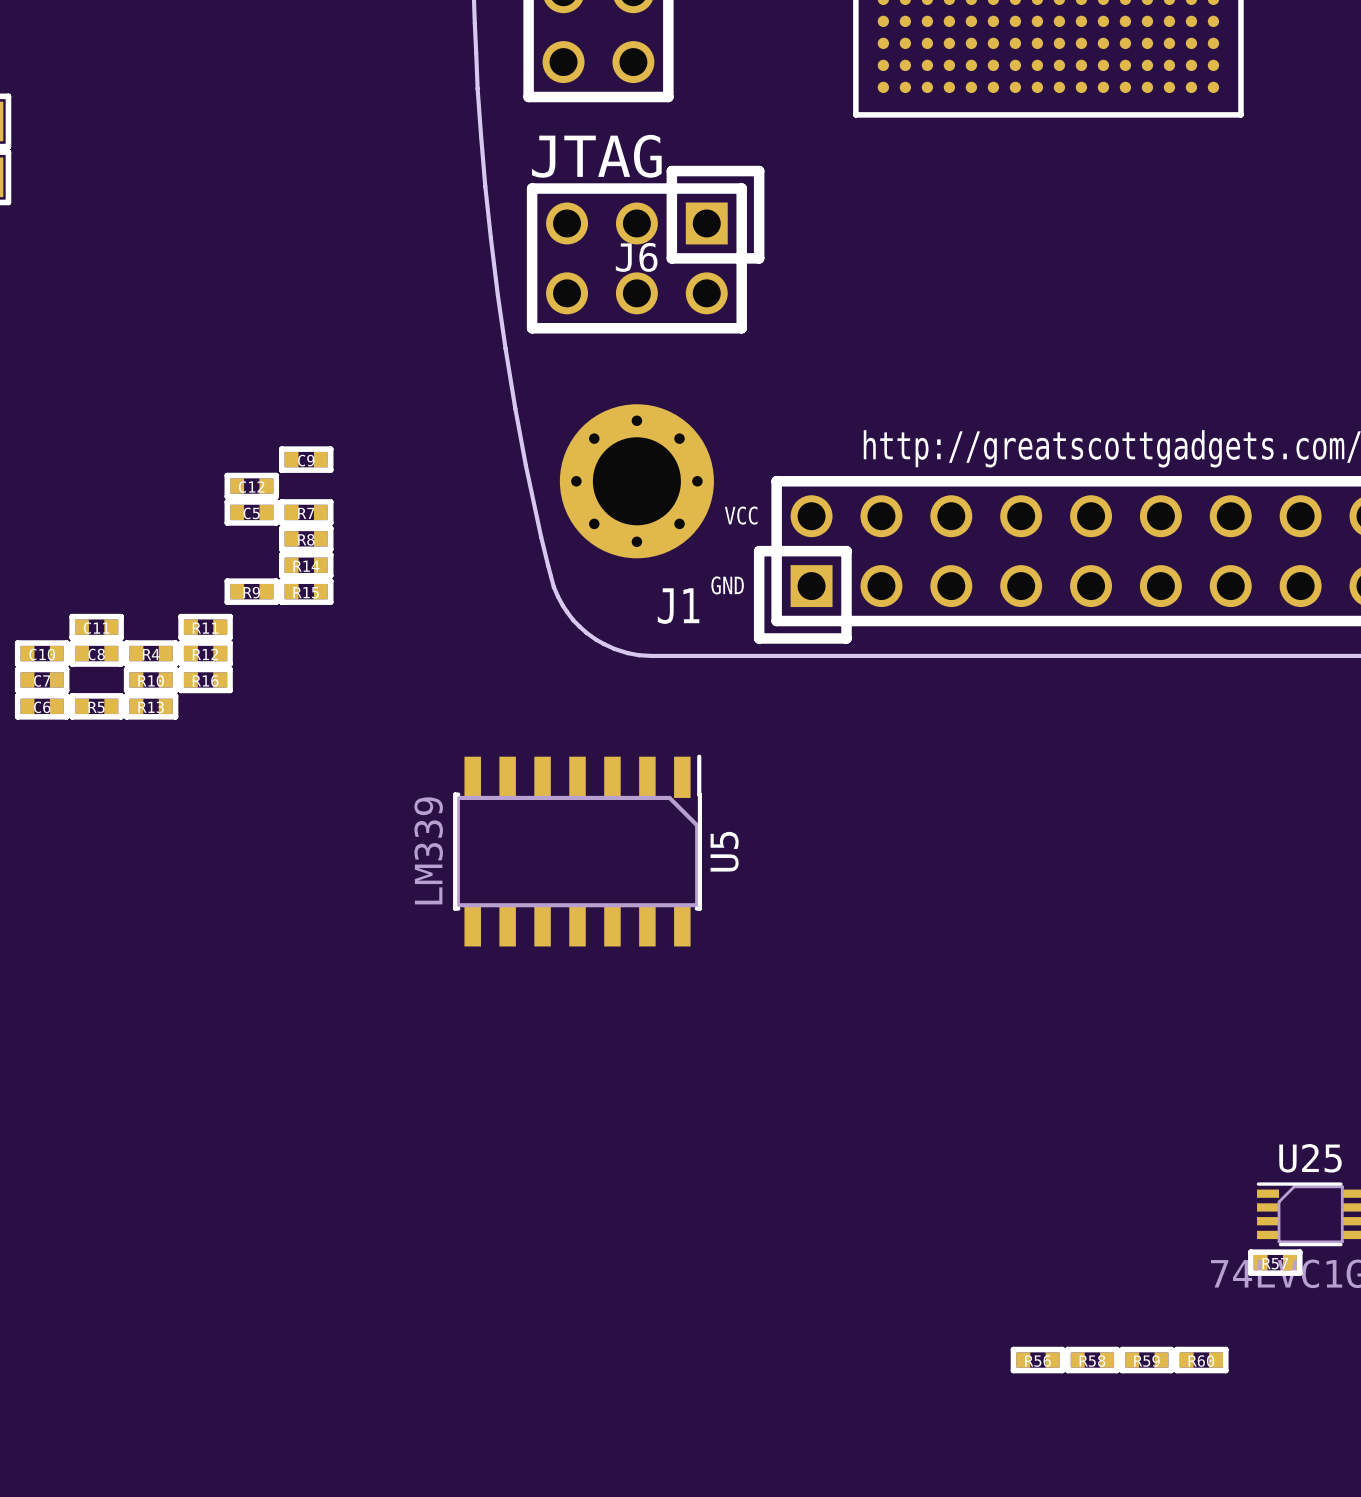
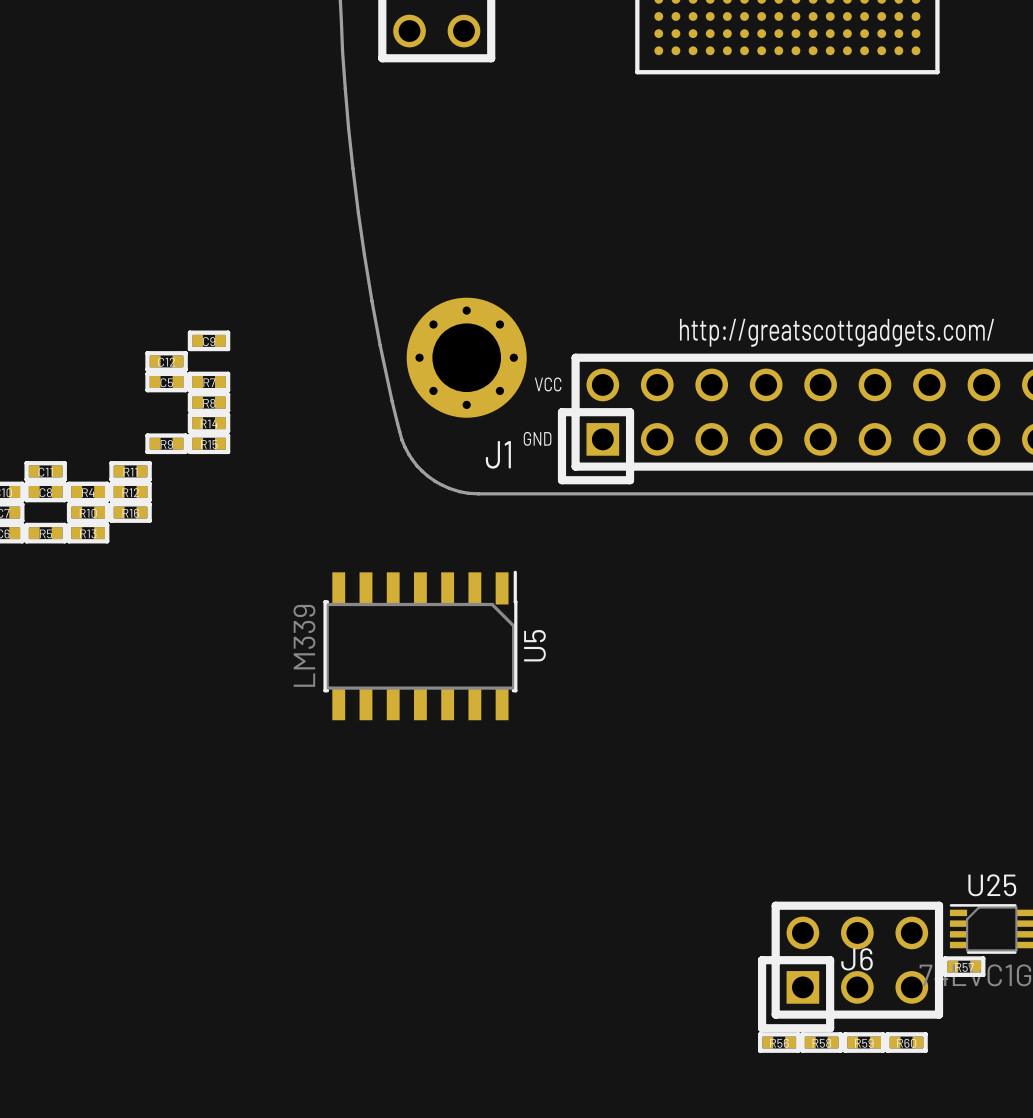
text: JTAG (596, 156) -> none
J6 rotation: 0° (645, 249) -> 180° (850, 966)
J6 position: (645, 249) -> (850, 966)

